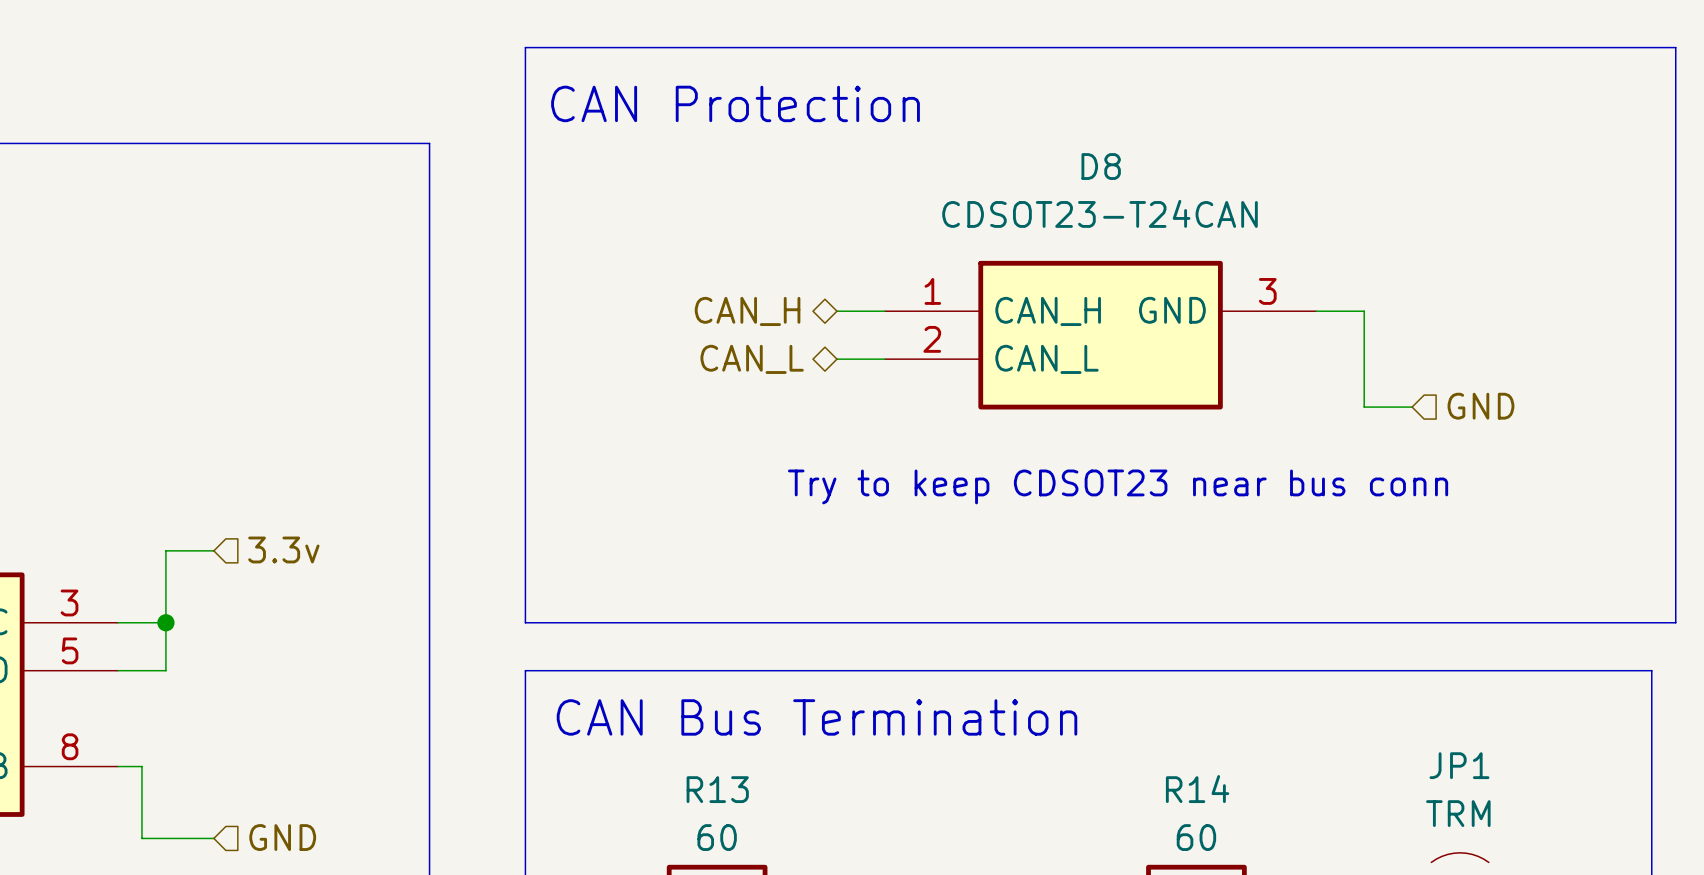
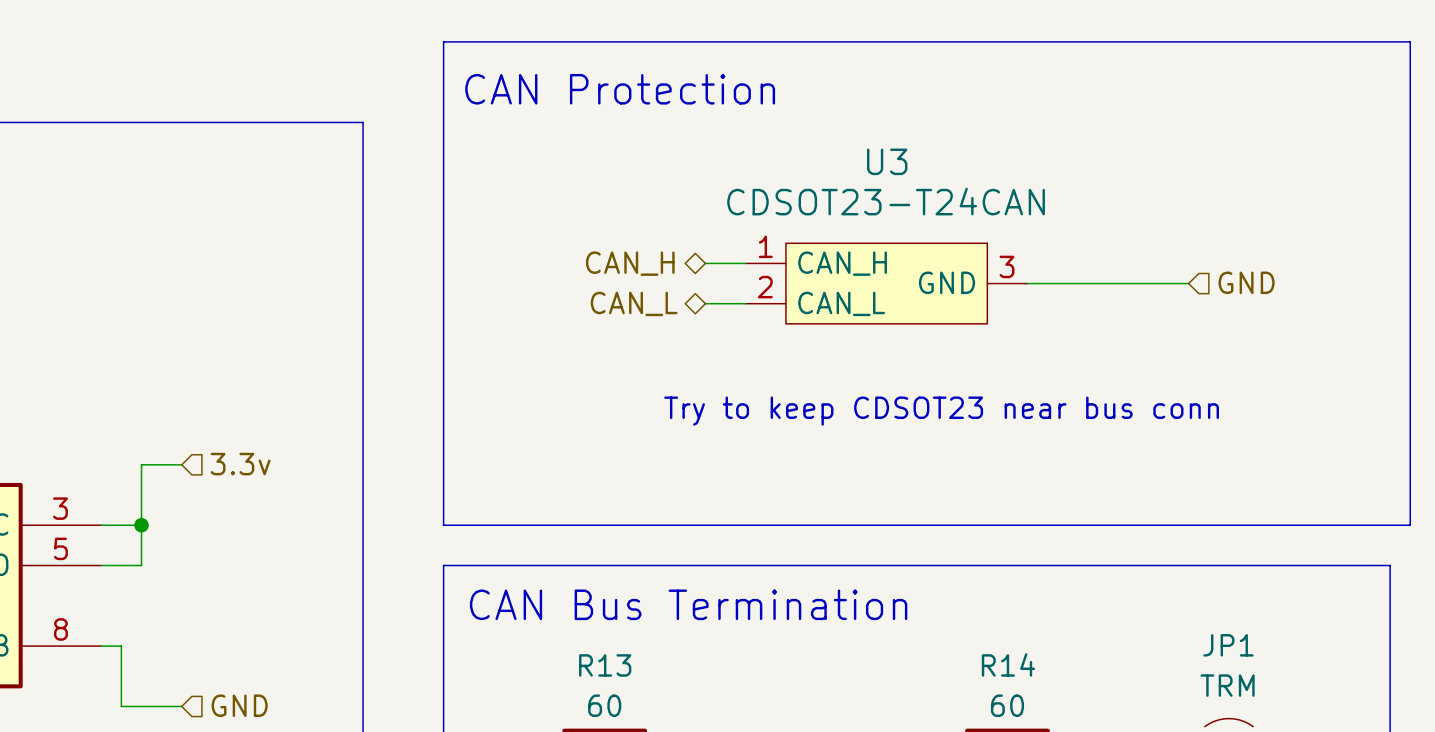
wire: (1316, 311) (1364, 311) (1364, 407) (1412, 407) -> none
U3: none -> CDSOT23-T24CAN (886, 283)
D8: CDSOT23-T24CAN (1100, 335) -> none
wire: none -> (1027, 283) (1188, 283)
hierarchical label position: GND (1480, 406) -> GND (1246, 282)

